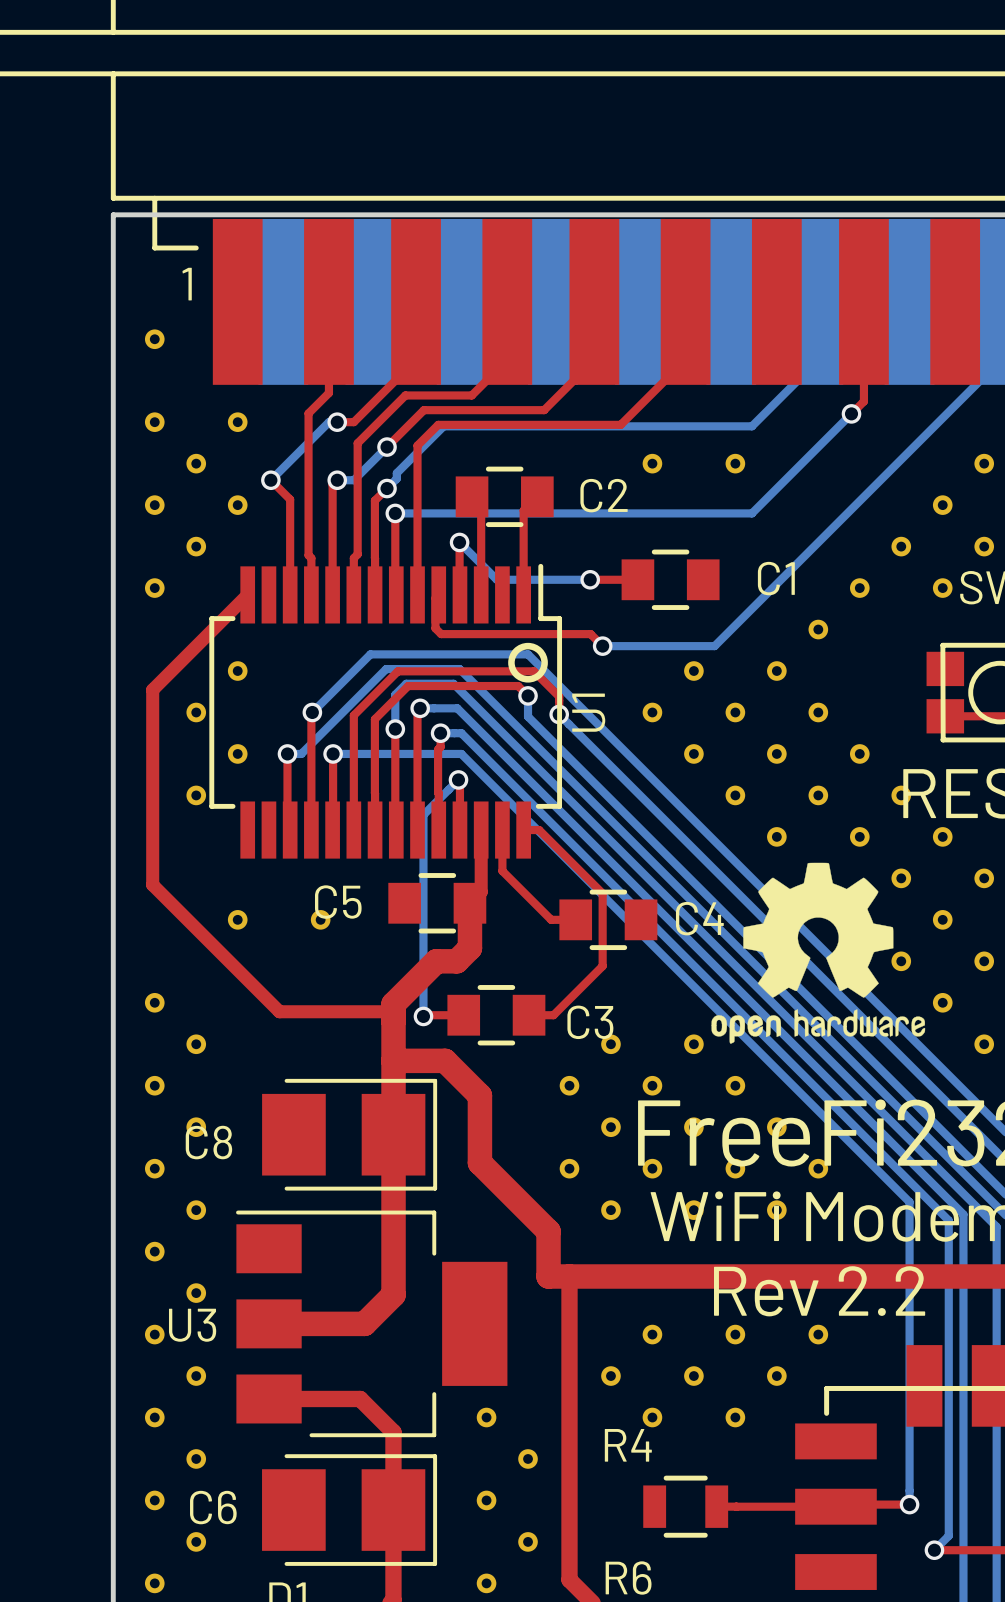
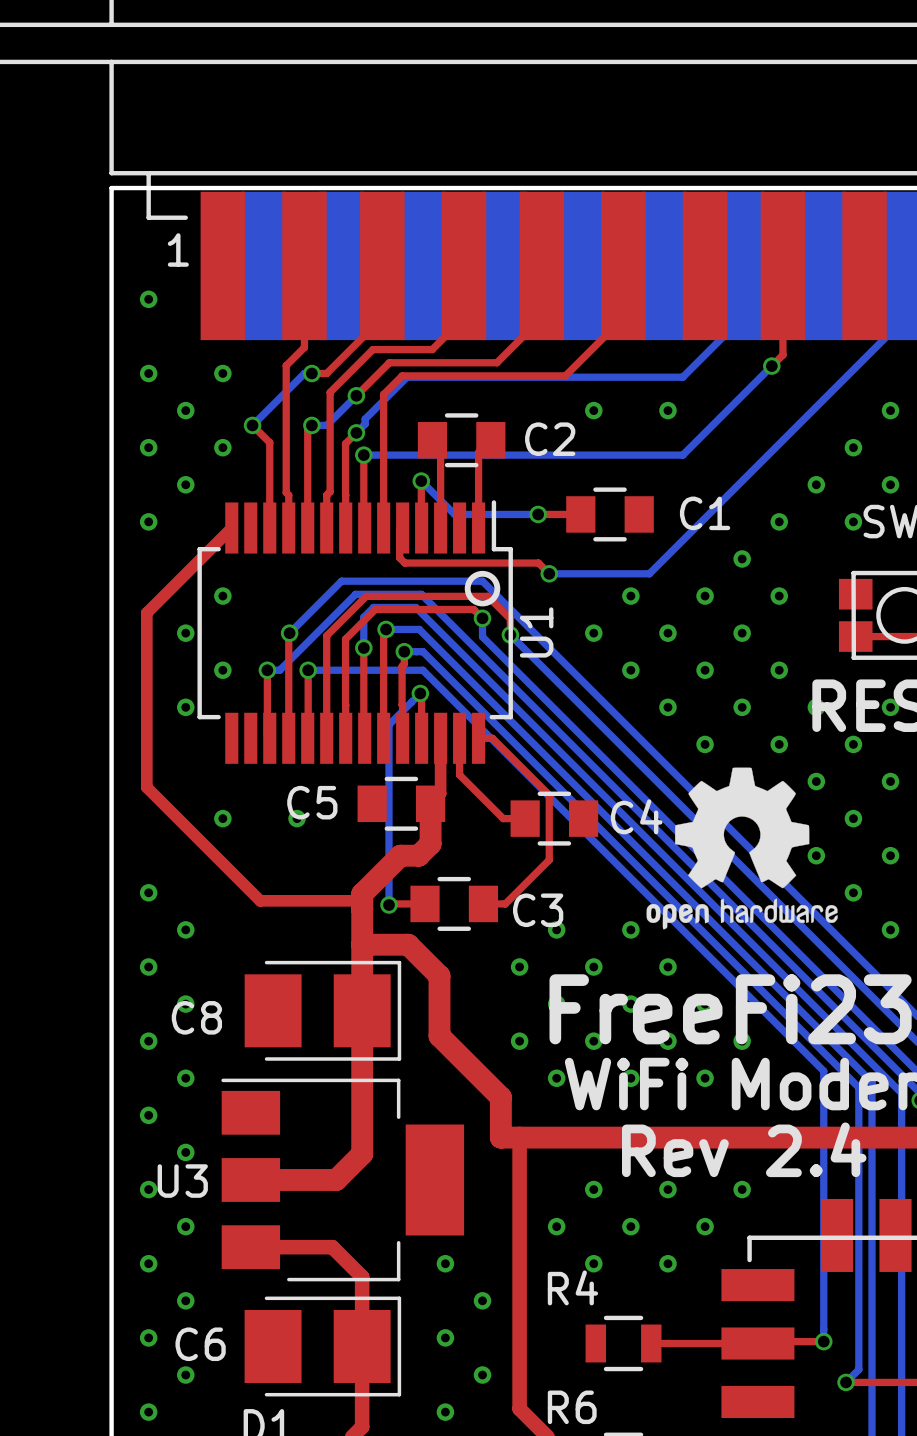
part: none -> (779, 596)
part: none -> (890, 707)
text: Rev 2.2 (819, 1291) -> Rev 2.4 (744, 1149)

